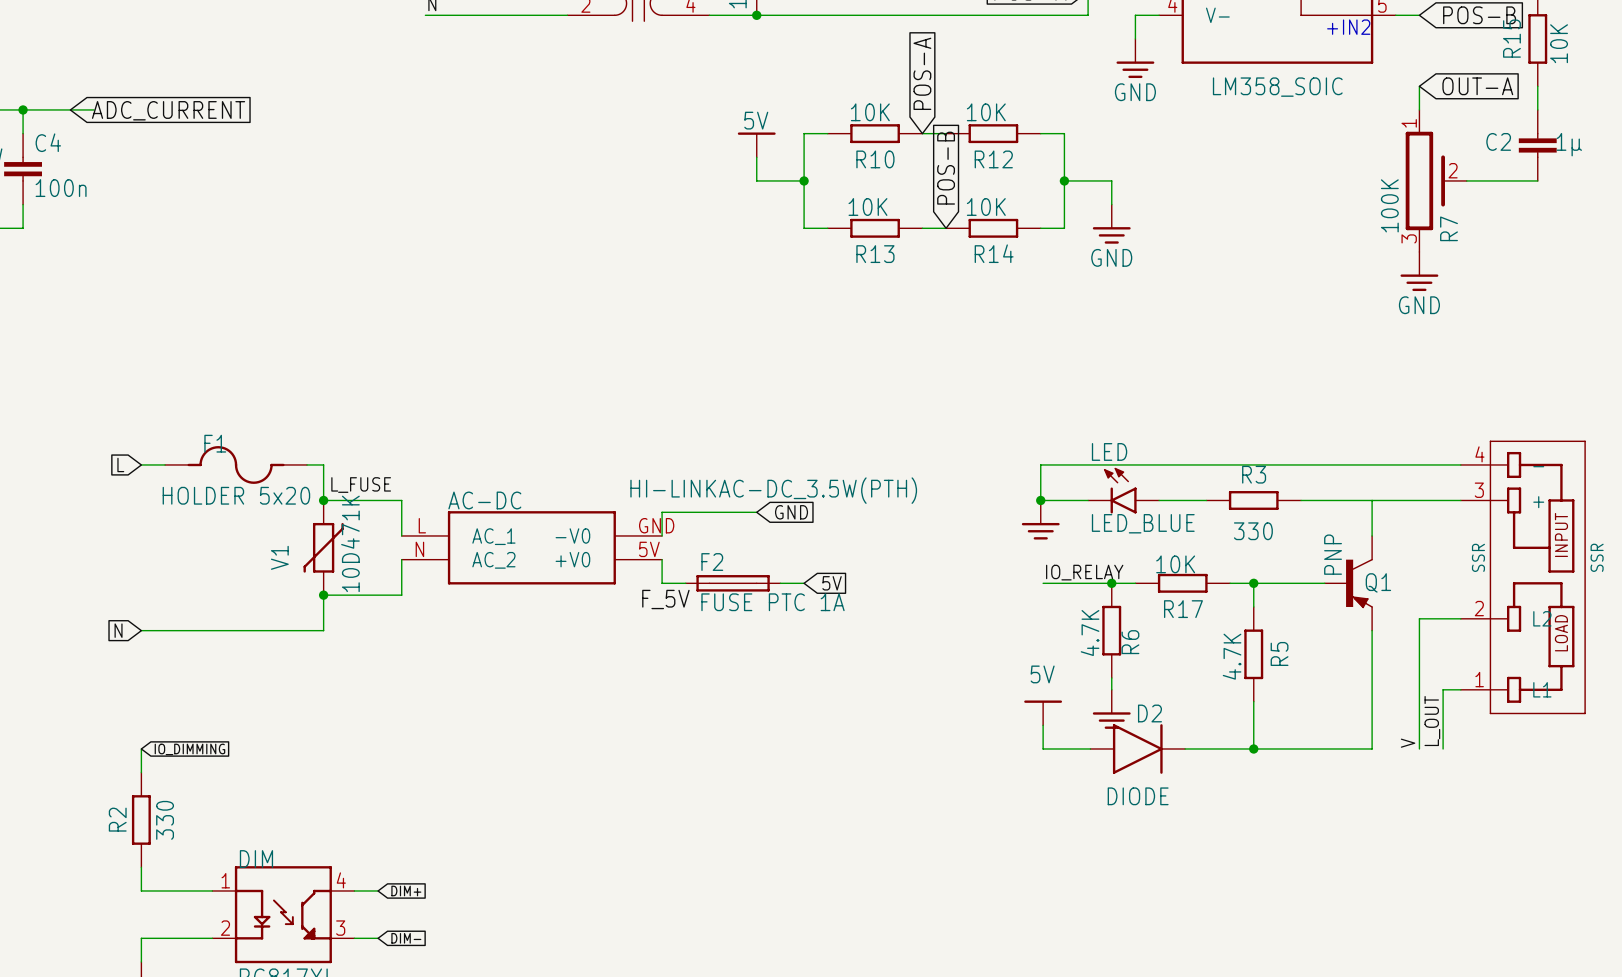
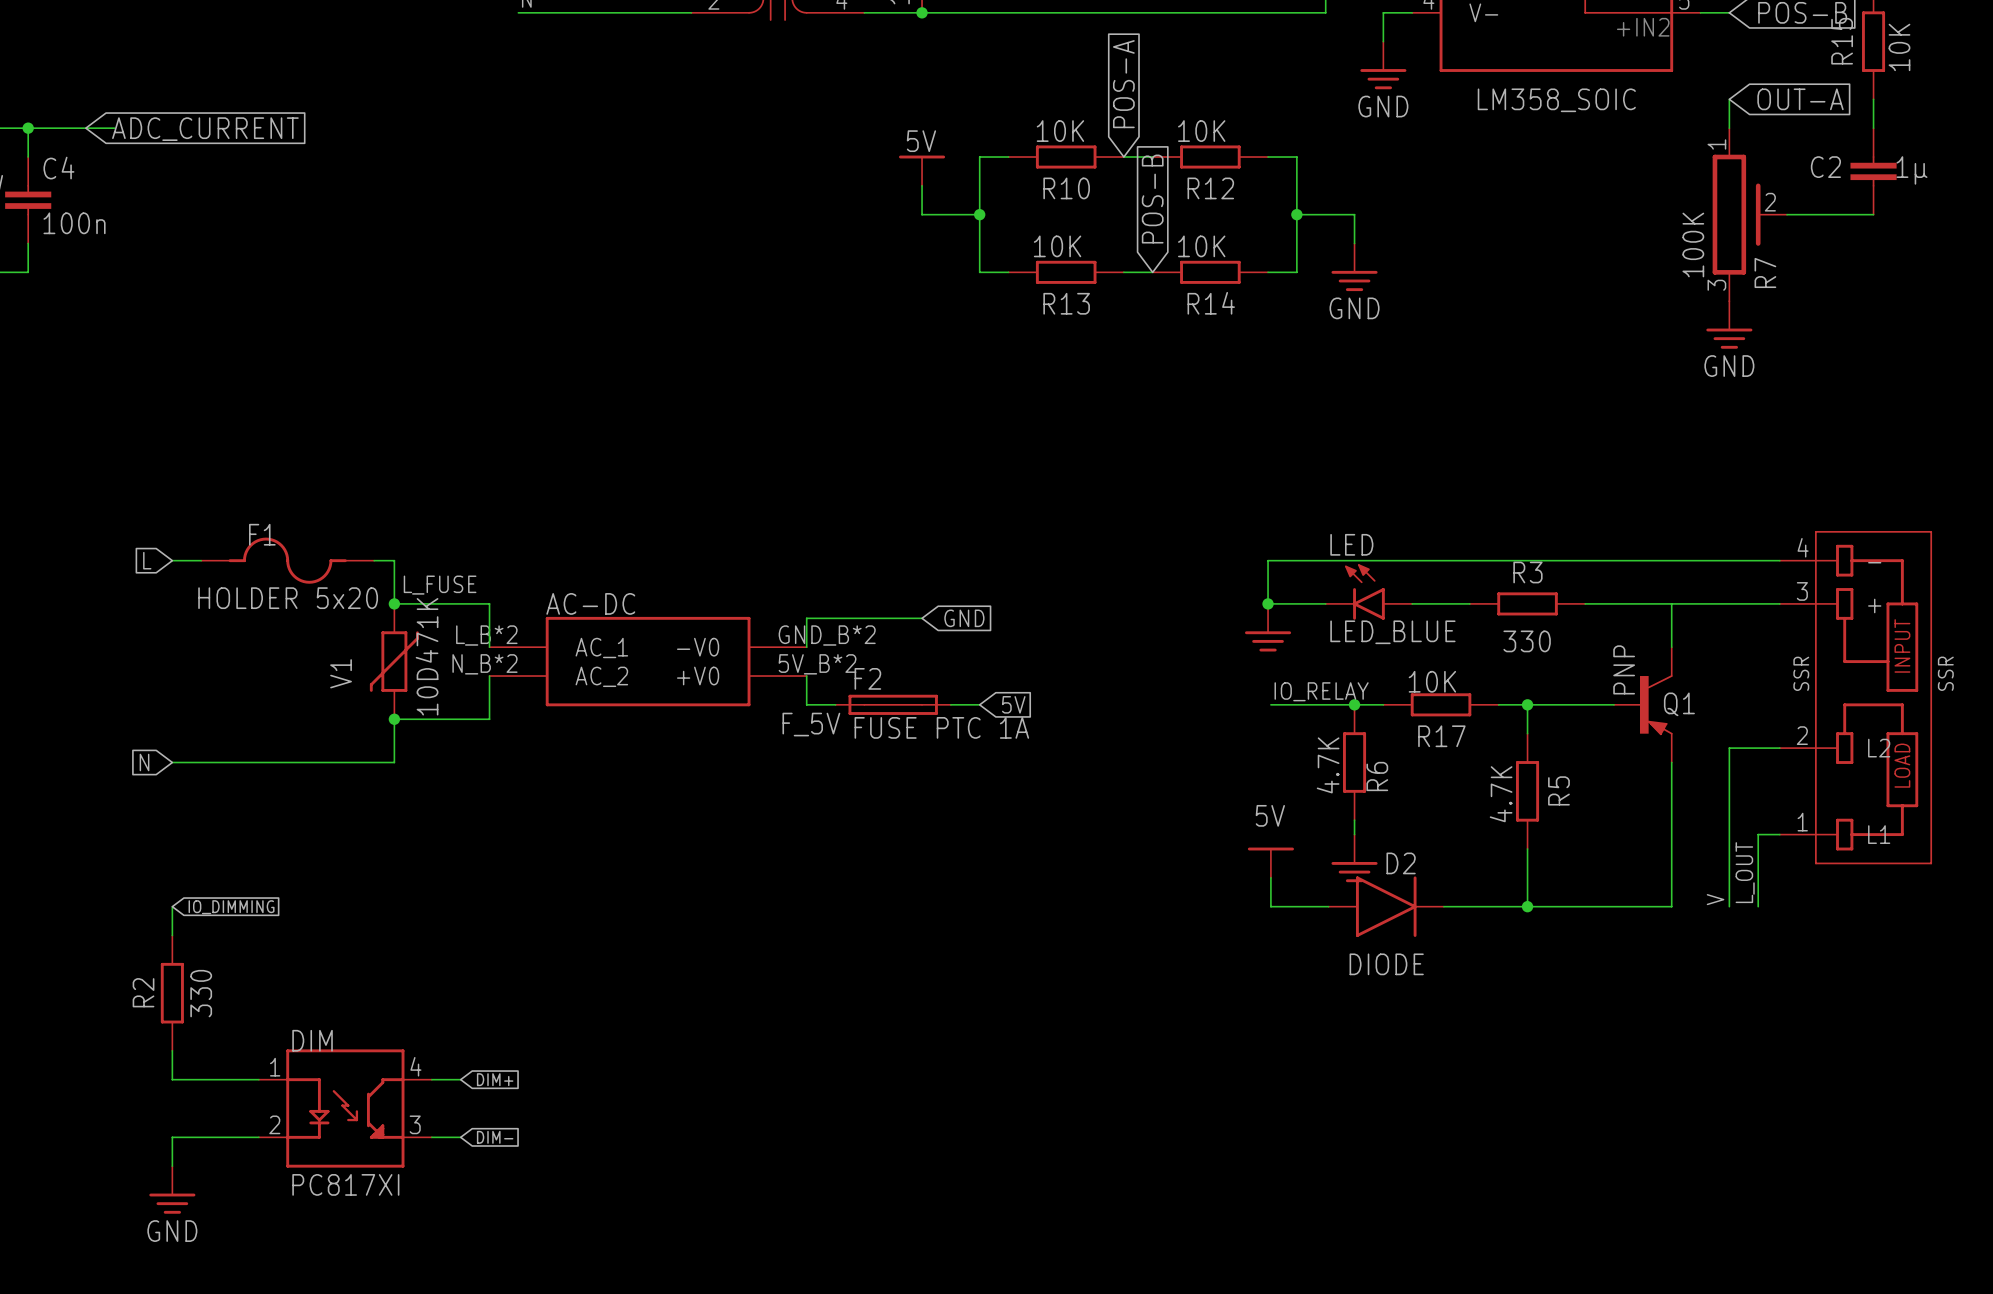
AC-DC value: HI-LINKAC-DC_3.5W(PTH) (773, 490) -> none
AC-DC pin number: L (422, 525) -> L_B*2 (486, 635)
AC-DC pin number: GND (656, 525) -> GND_B*2 (827, 635)
AC-DC pin number: N (419, 549) -> N_B*2 (484, 664)
AC-DC pin number: 5V (649, 549) -> 5V_B*2 (817, 664)

